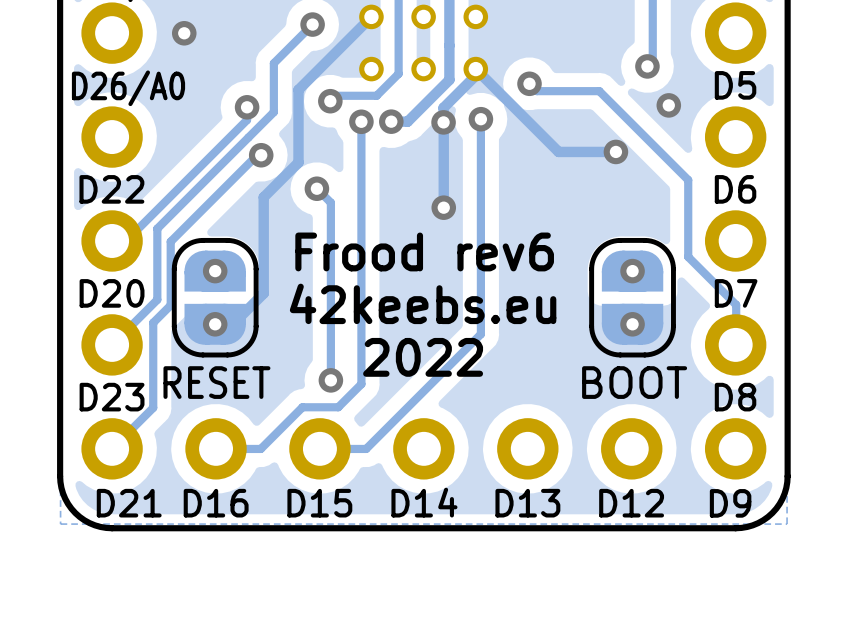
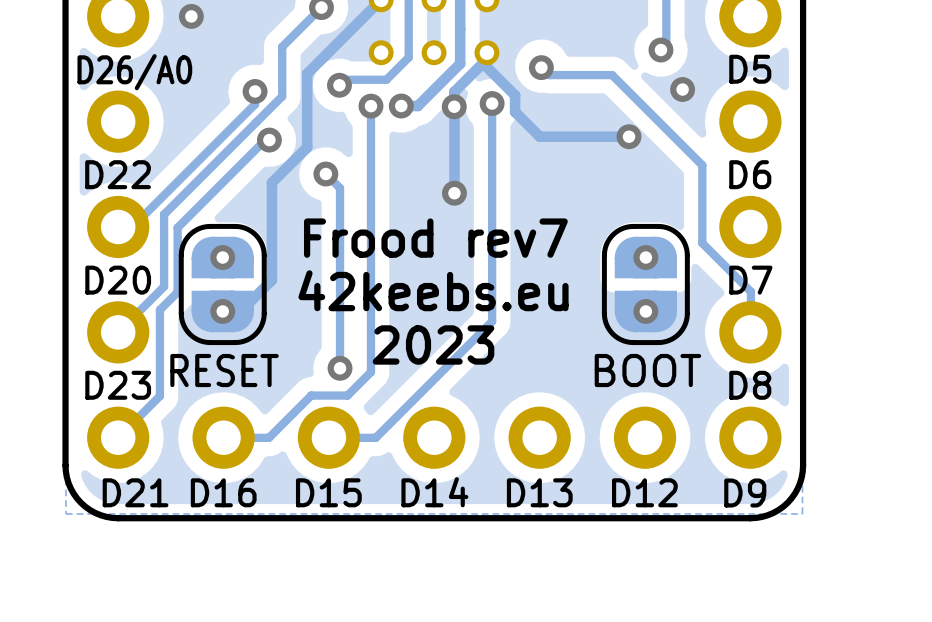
track: (475, 69) (558, 151) -> (486, 59) (486, 67) (515, 95) (515, 111) (539, 136) (570, 136)
text: Frood rev6 (424, 251) -> Frood rev7 (435, 238)
text: 2022 (423, 357) -> 2023 (433, 344)

